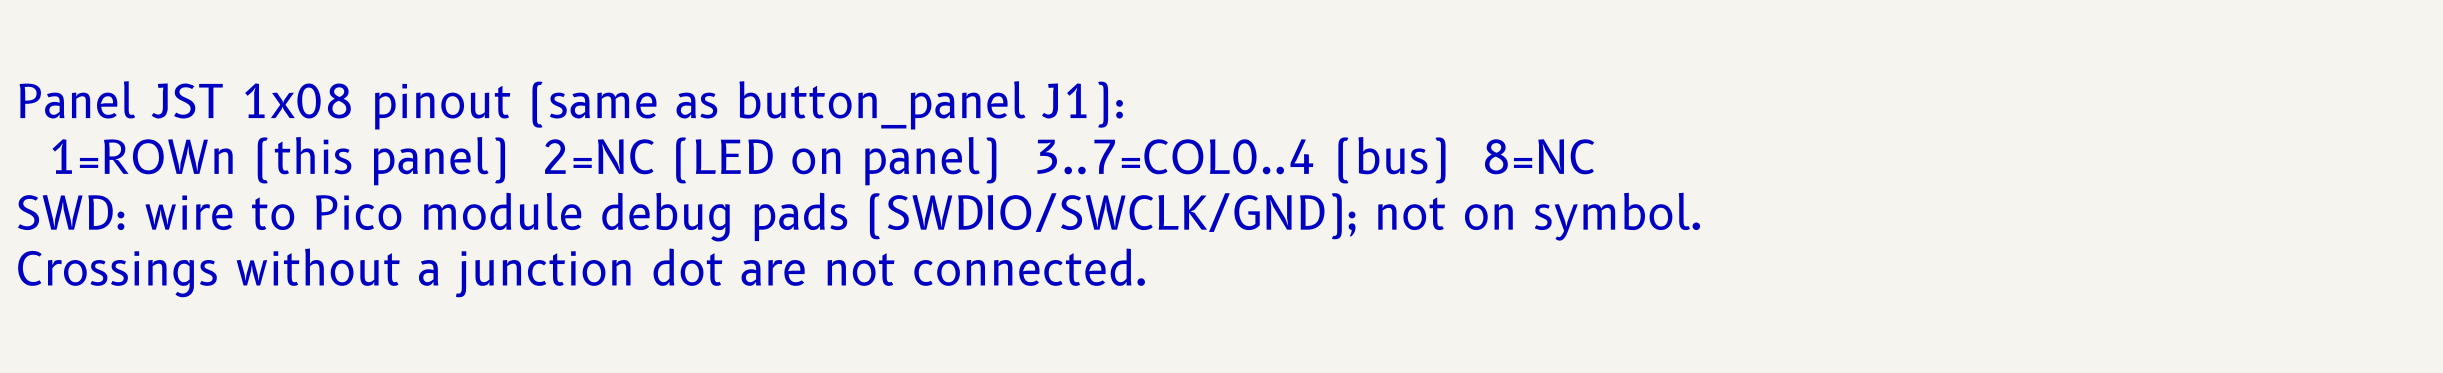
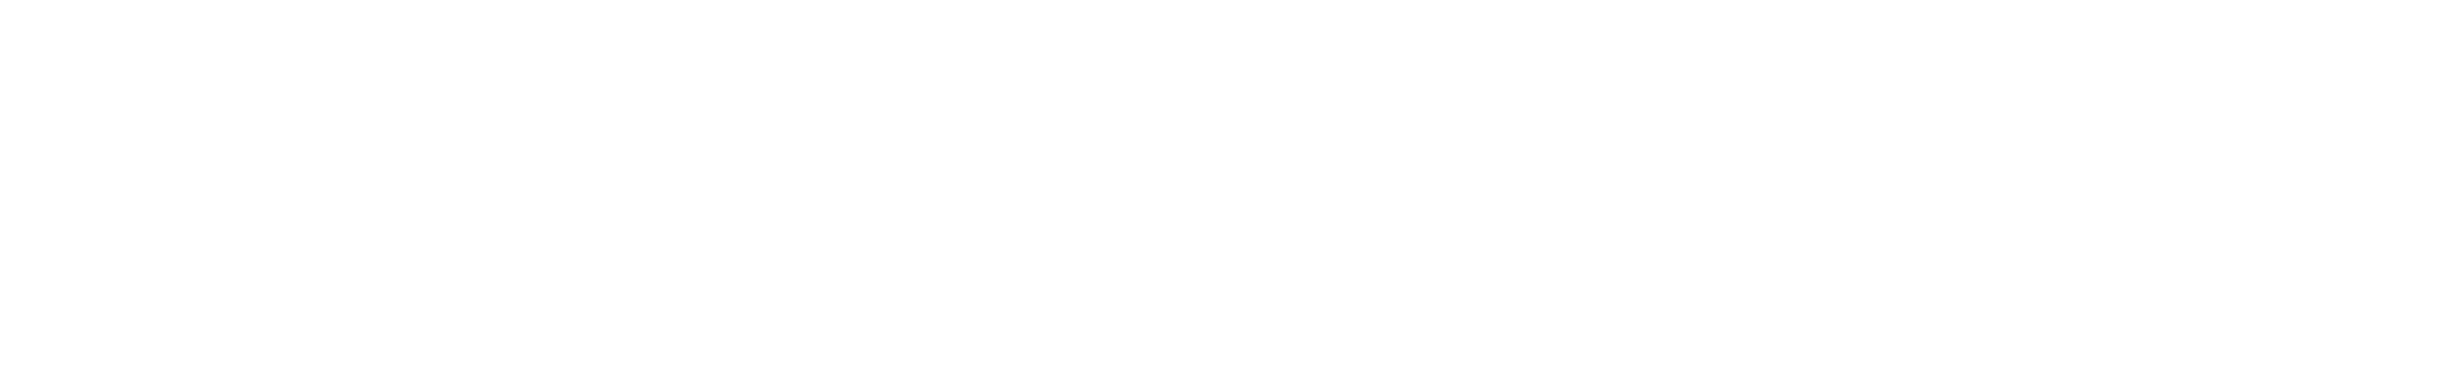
text: Panel JST 1x08 pinout (same as button_panel J1): (571, 105) -> none
text: 1=ROWn (this panel) 2=NC (LED on panel) 3..7=COL0..4 (bus) 8=NC (823, 161) -> none
text: SWD: wire to Pico module debug pads (SWDIO/SWCLK/GND); not on symbol. (859, 217) -> none
text: Crossings without a junction dot are not connected. (581, 272) -> none

